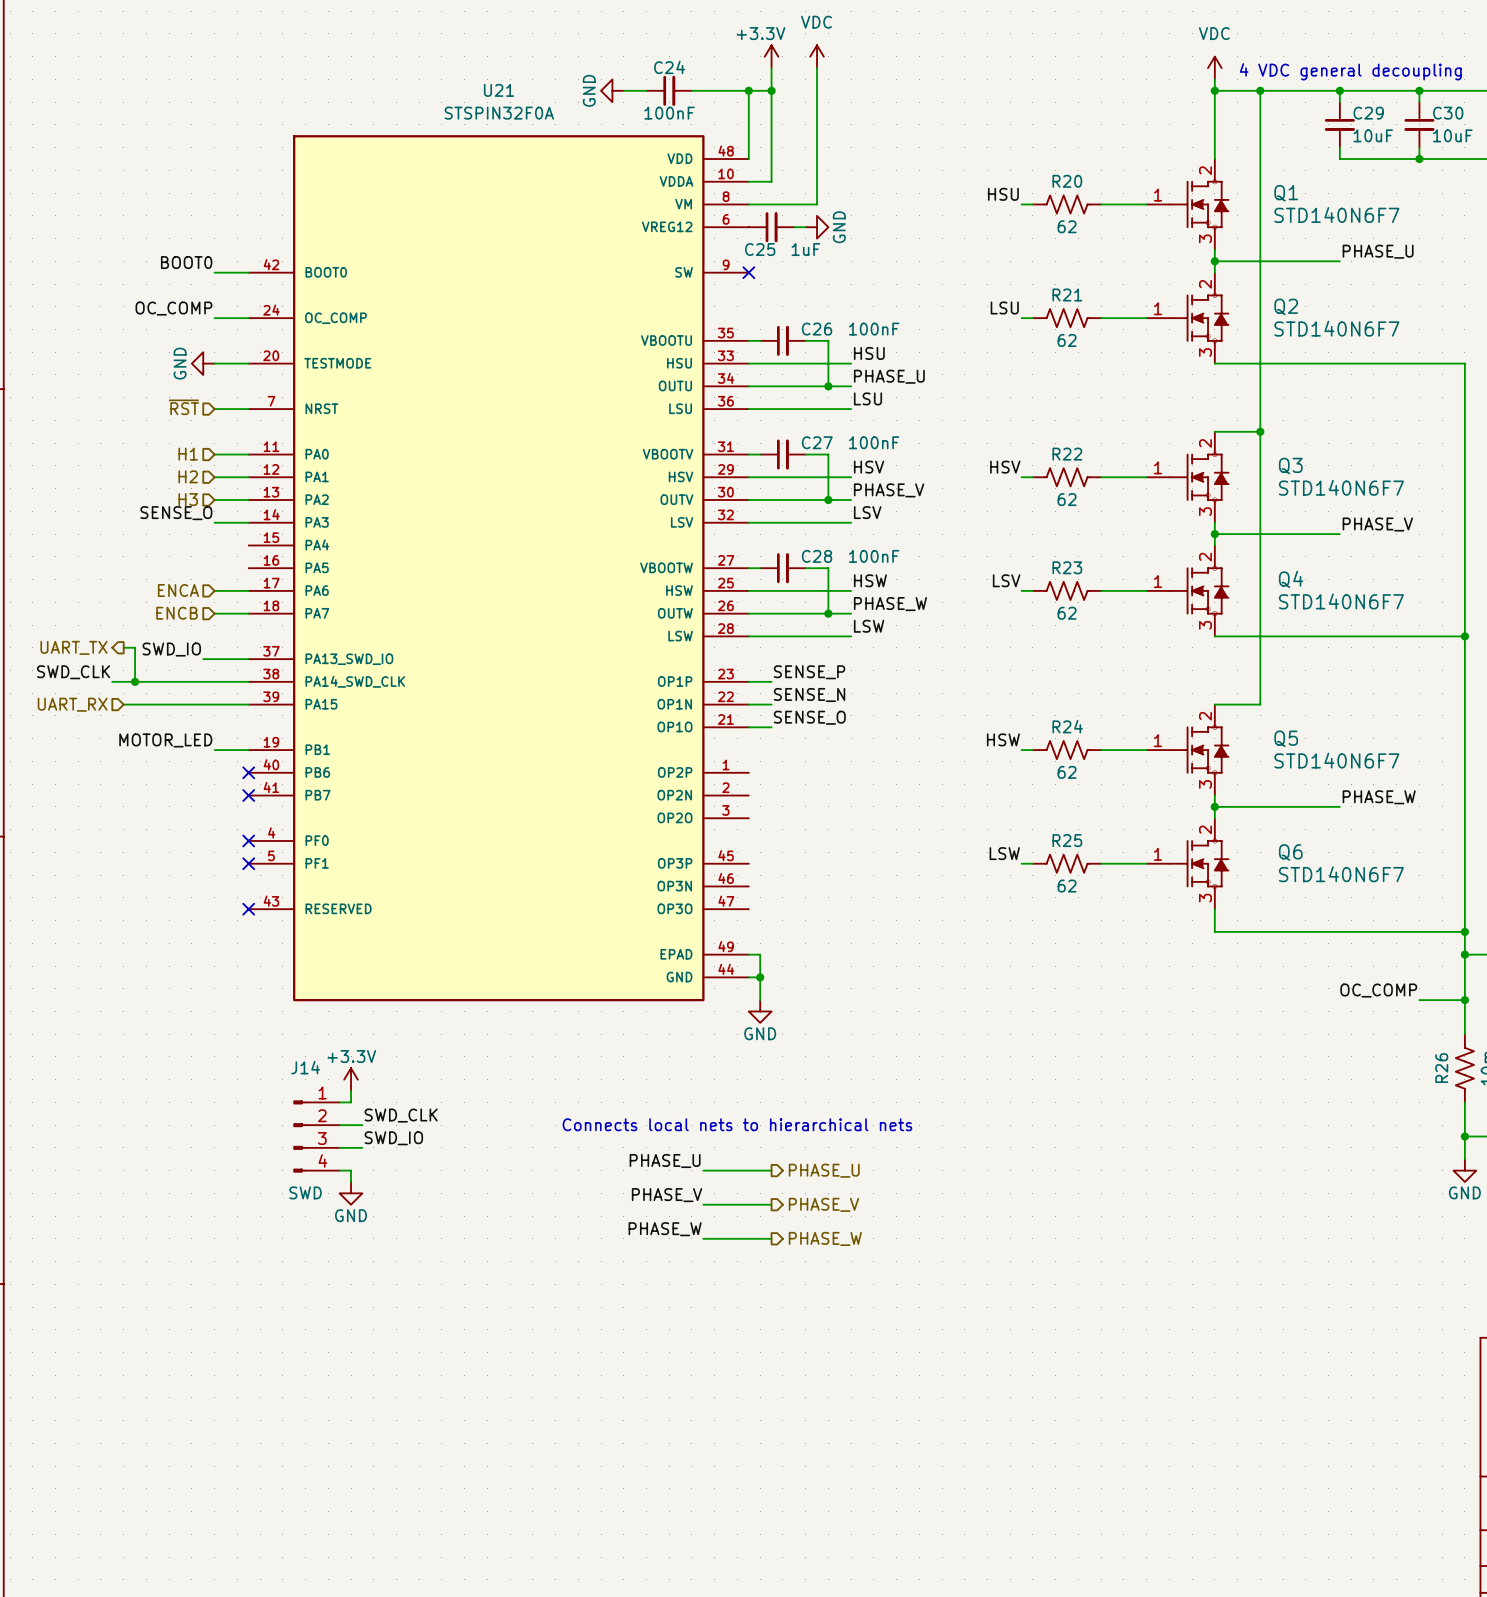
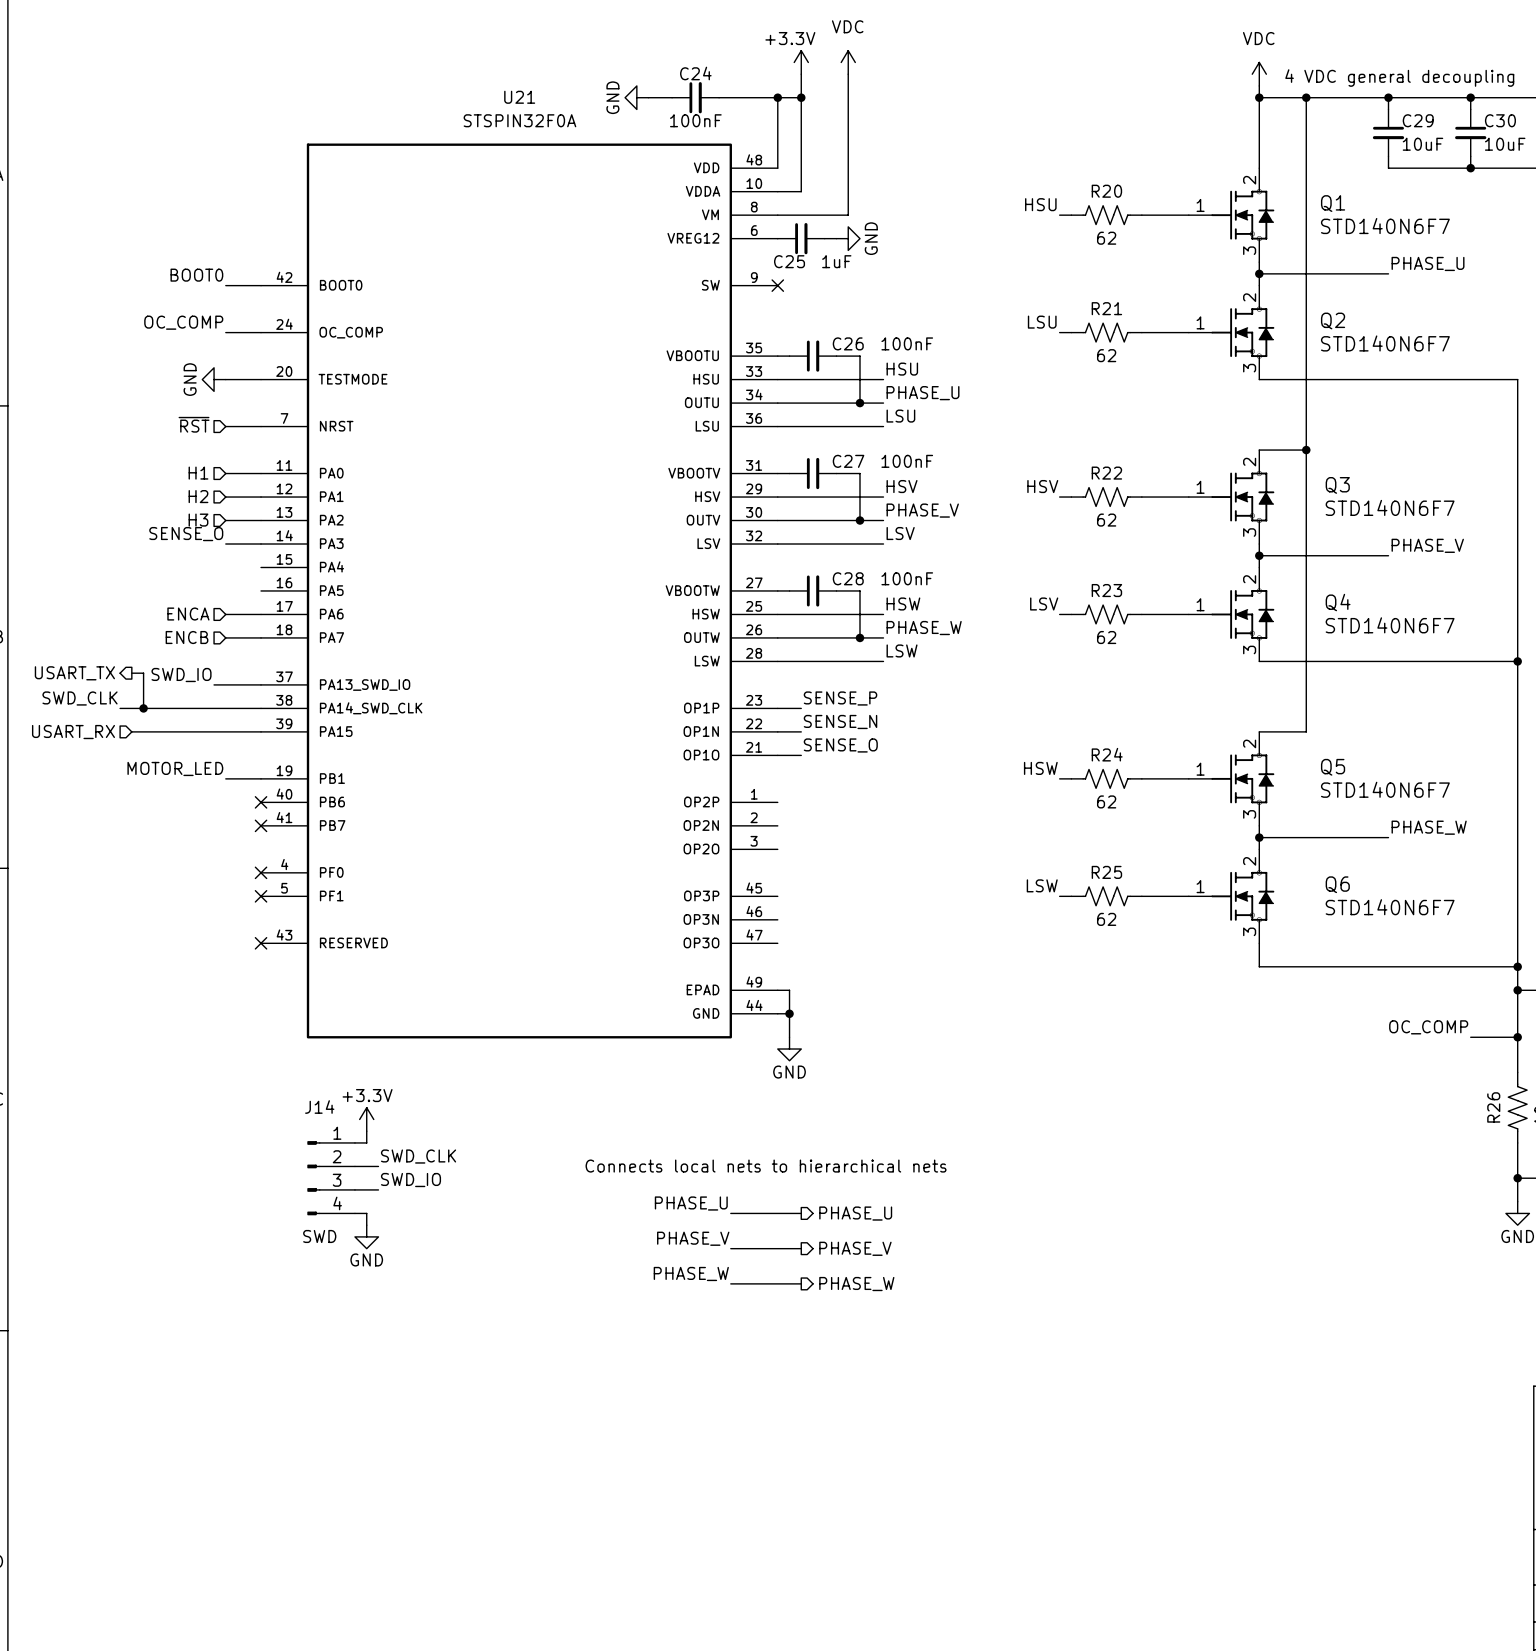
hierarchical label: UART_TX (73, 647) -> USART_TX (74, 673)
hierarchical label: UART_RX (72, 704) -> USART_RX (73, 732)

